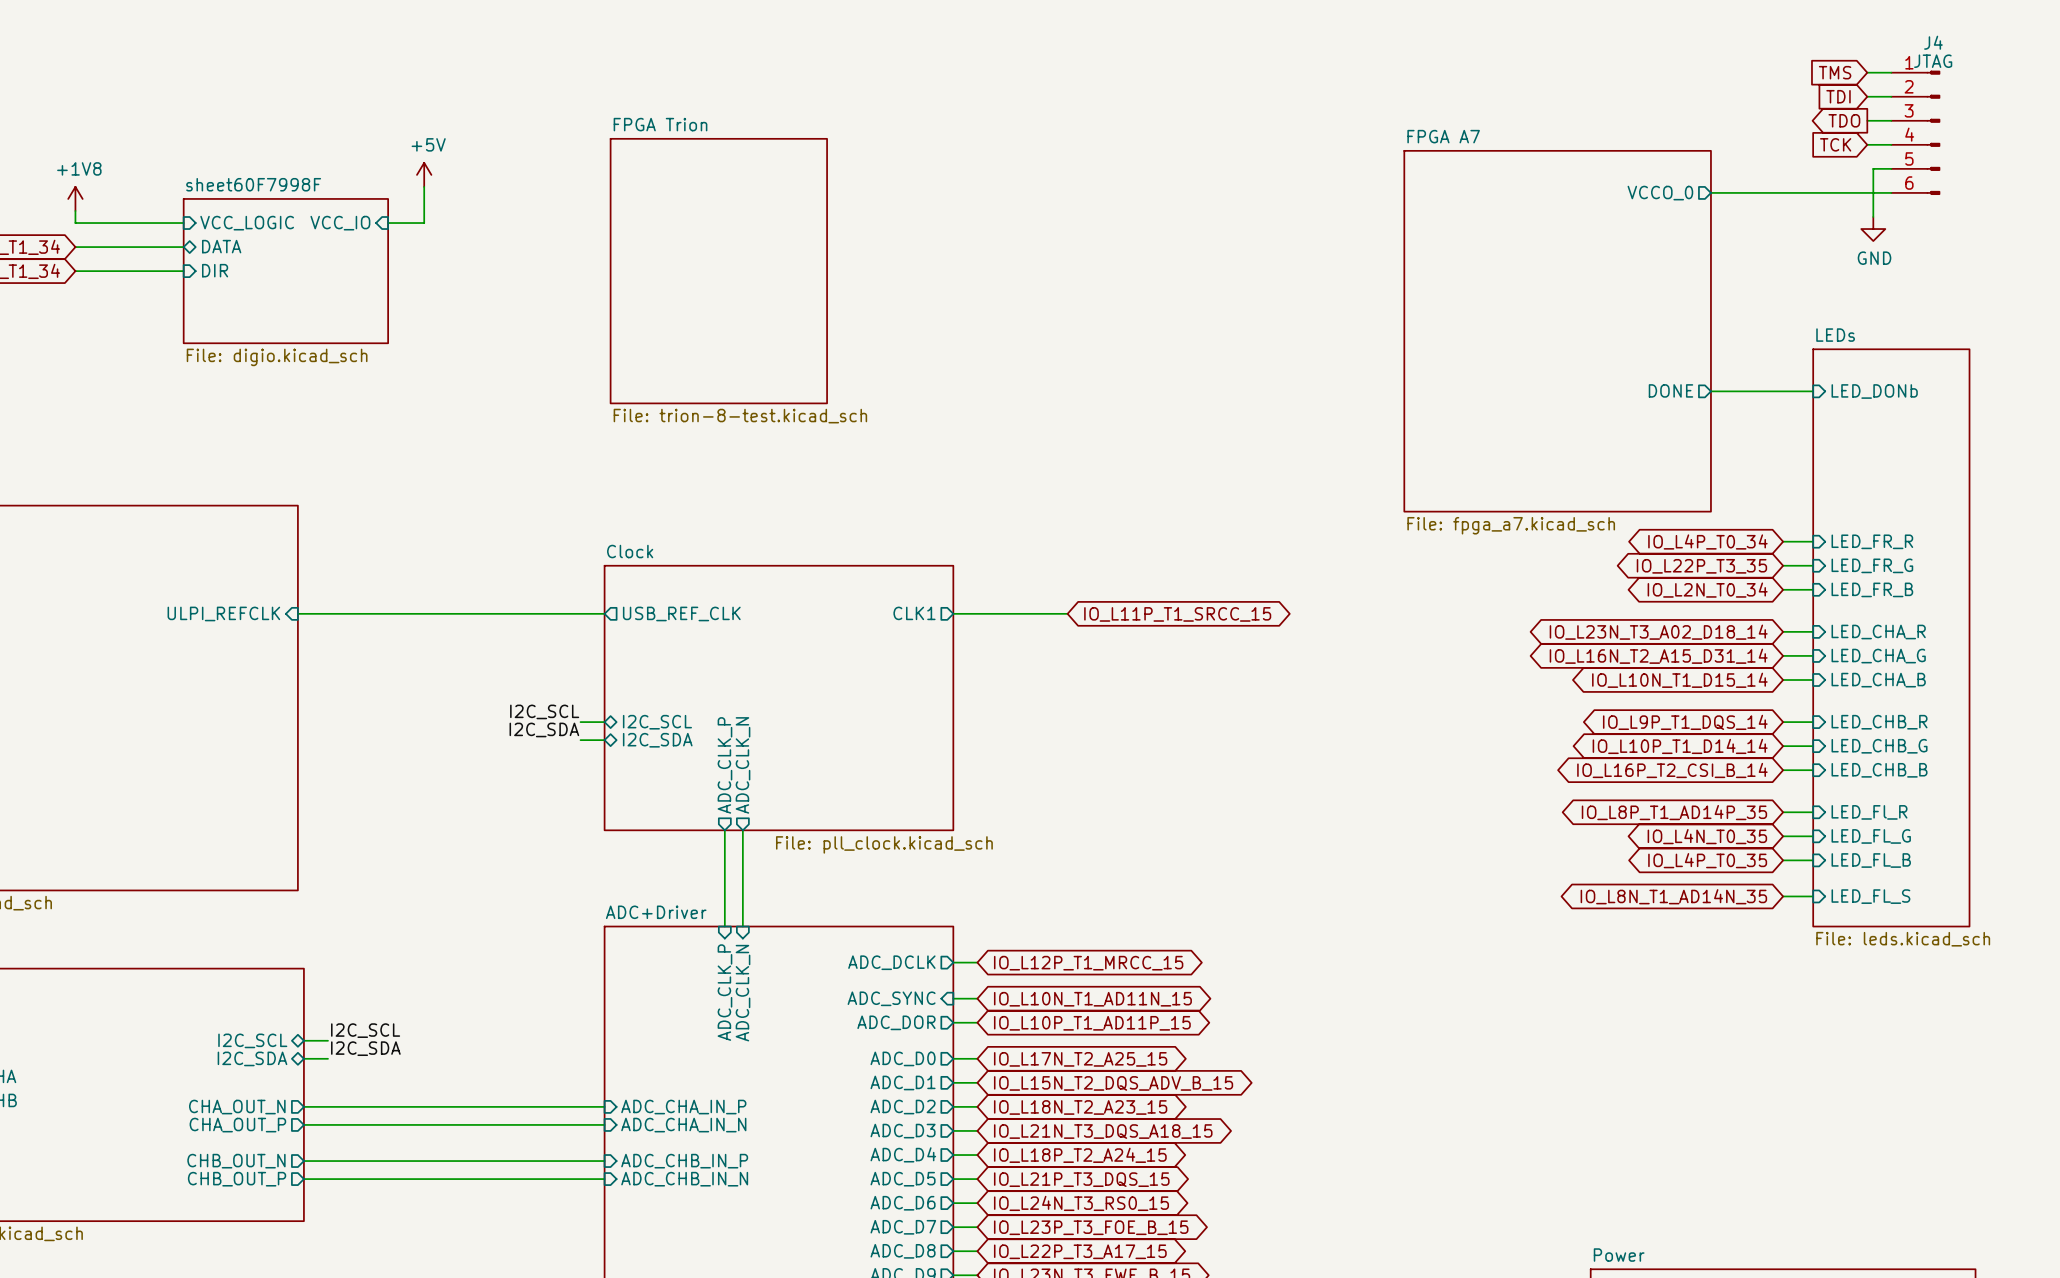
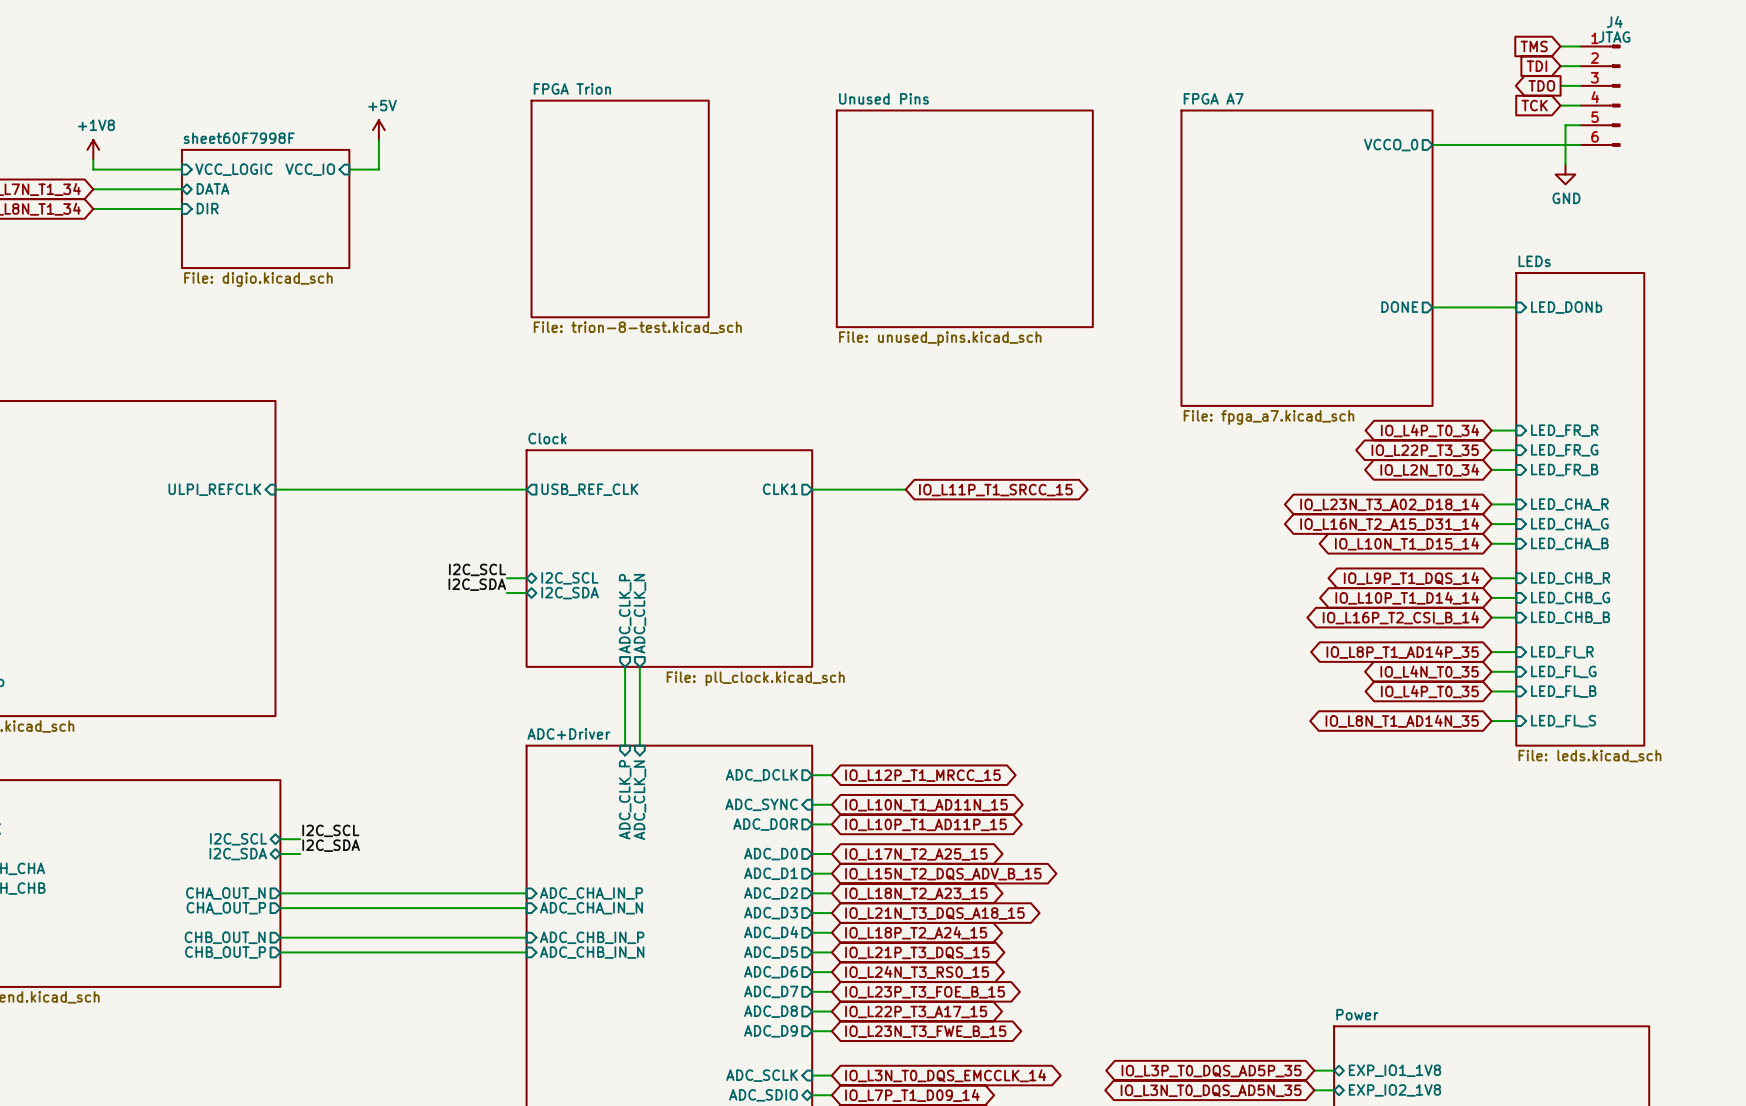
sheet Unused Pins: none -> File: unused_pins.kicad_sch (964, 218)

